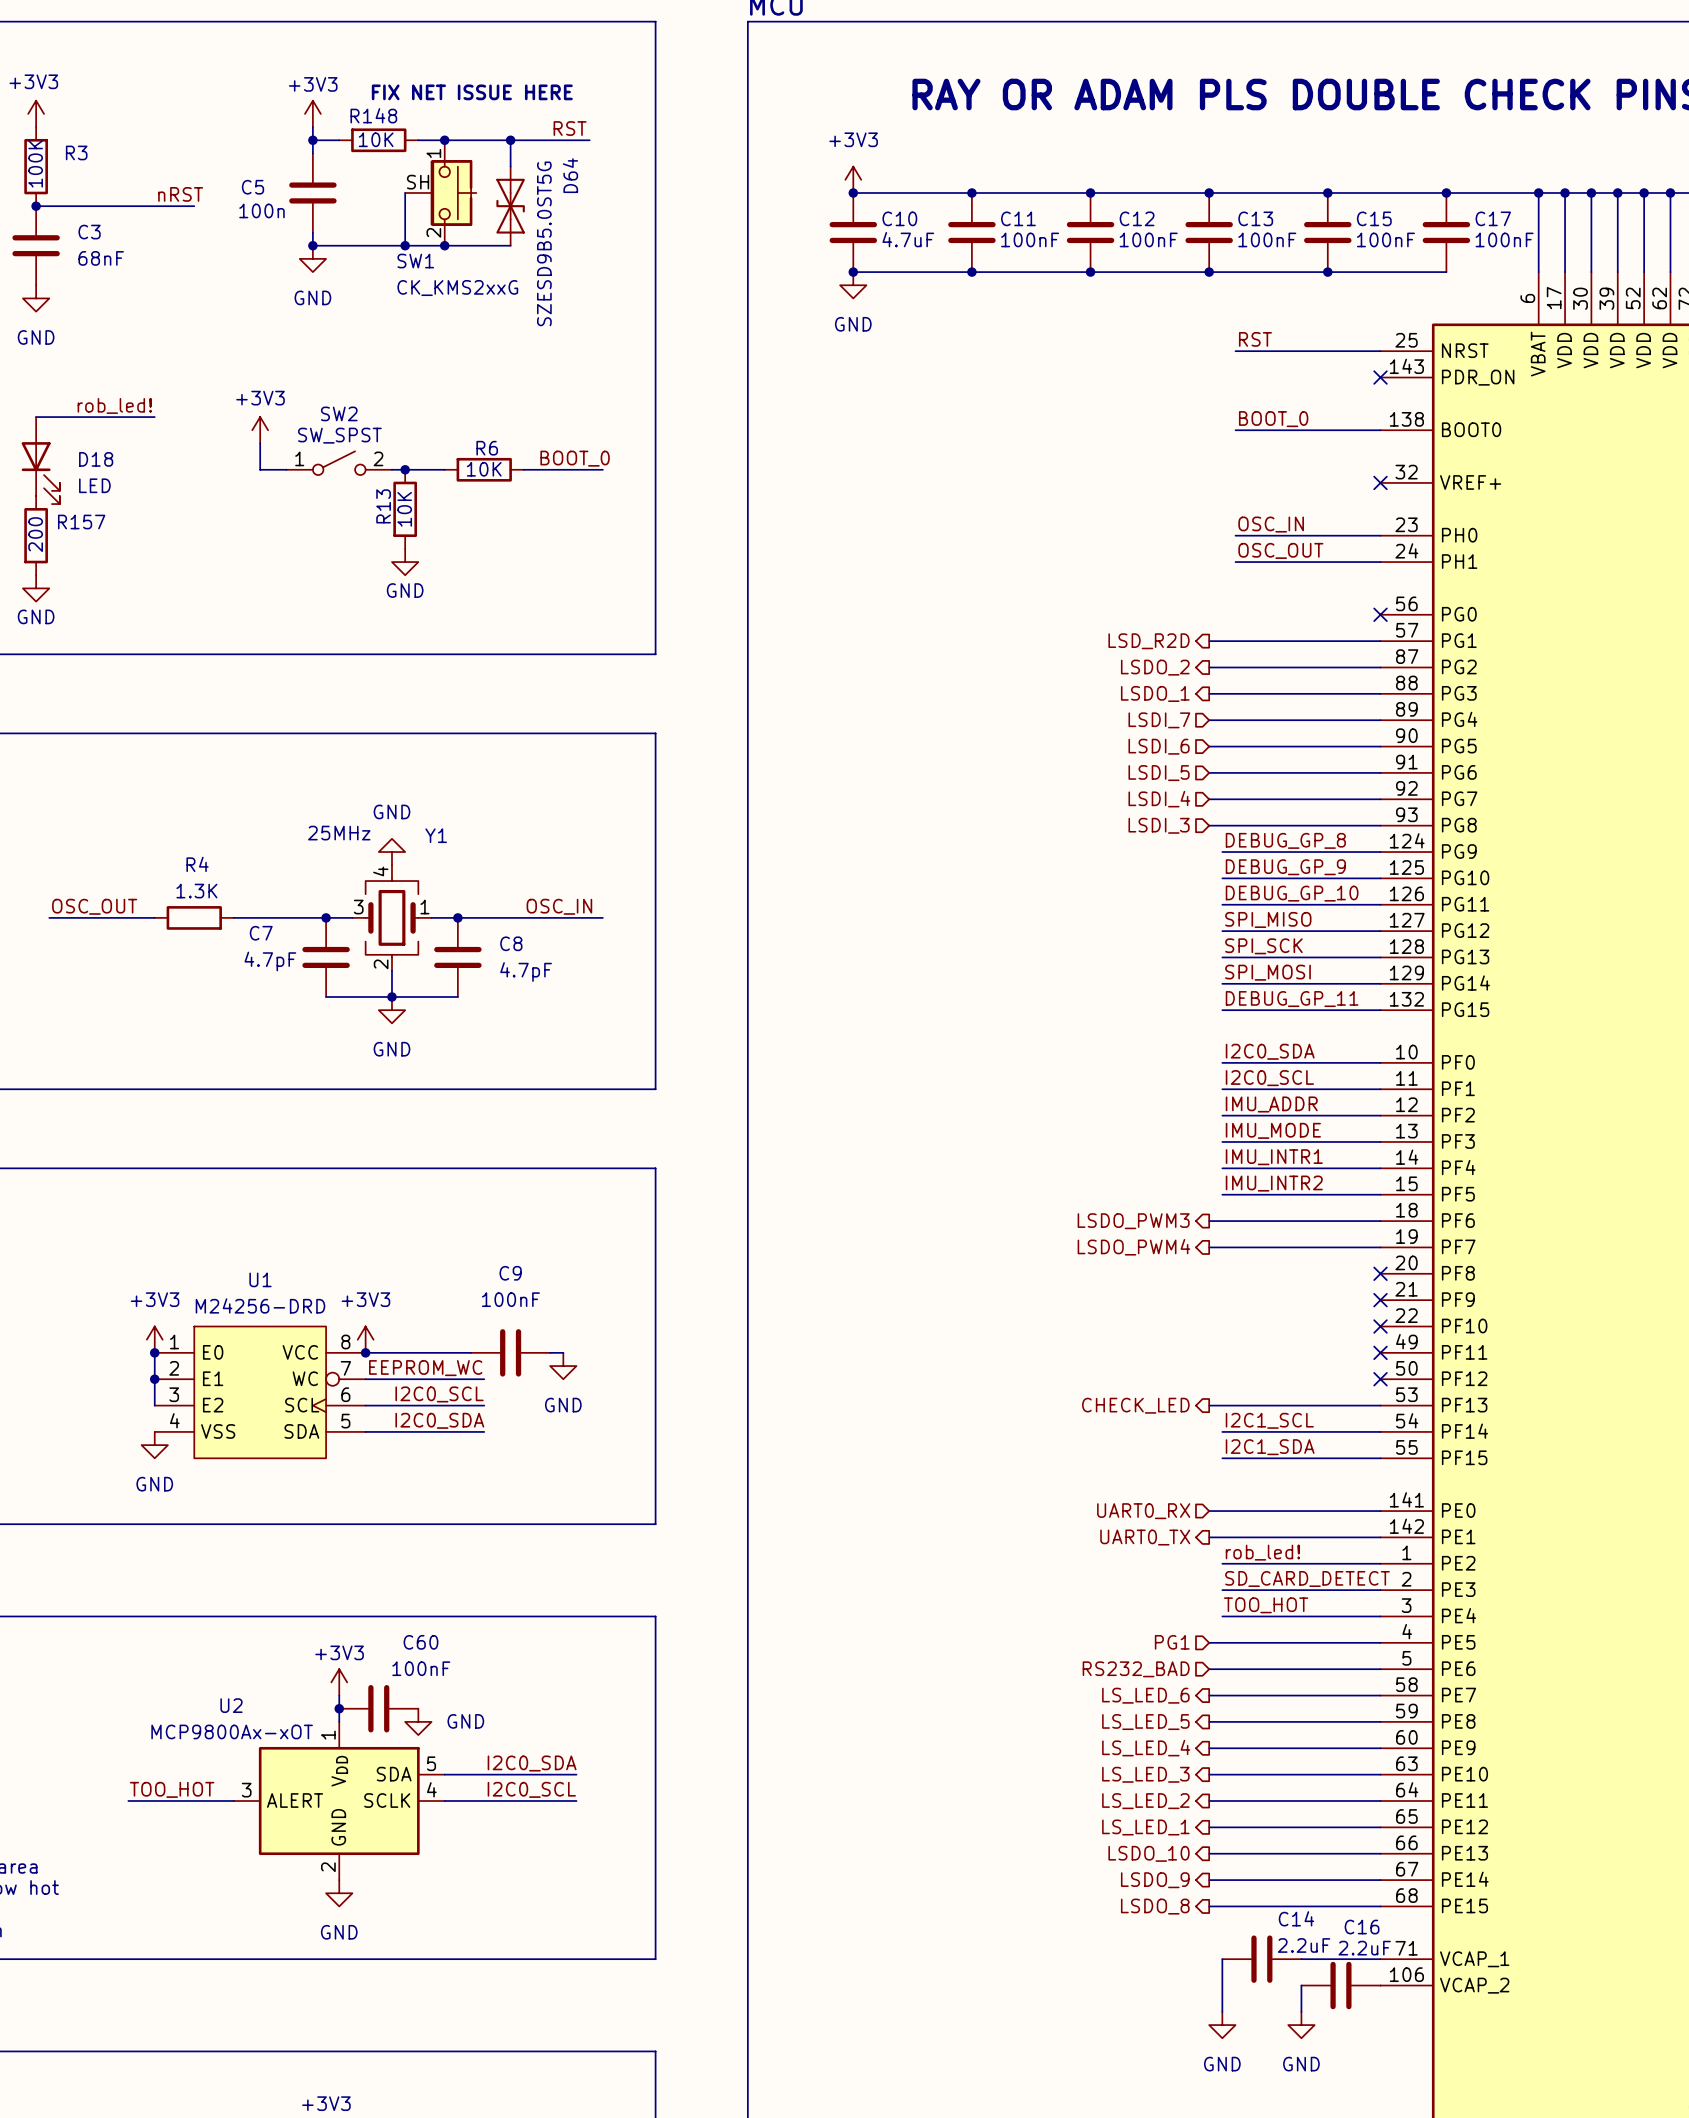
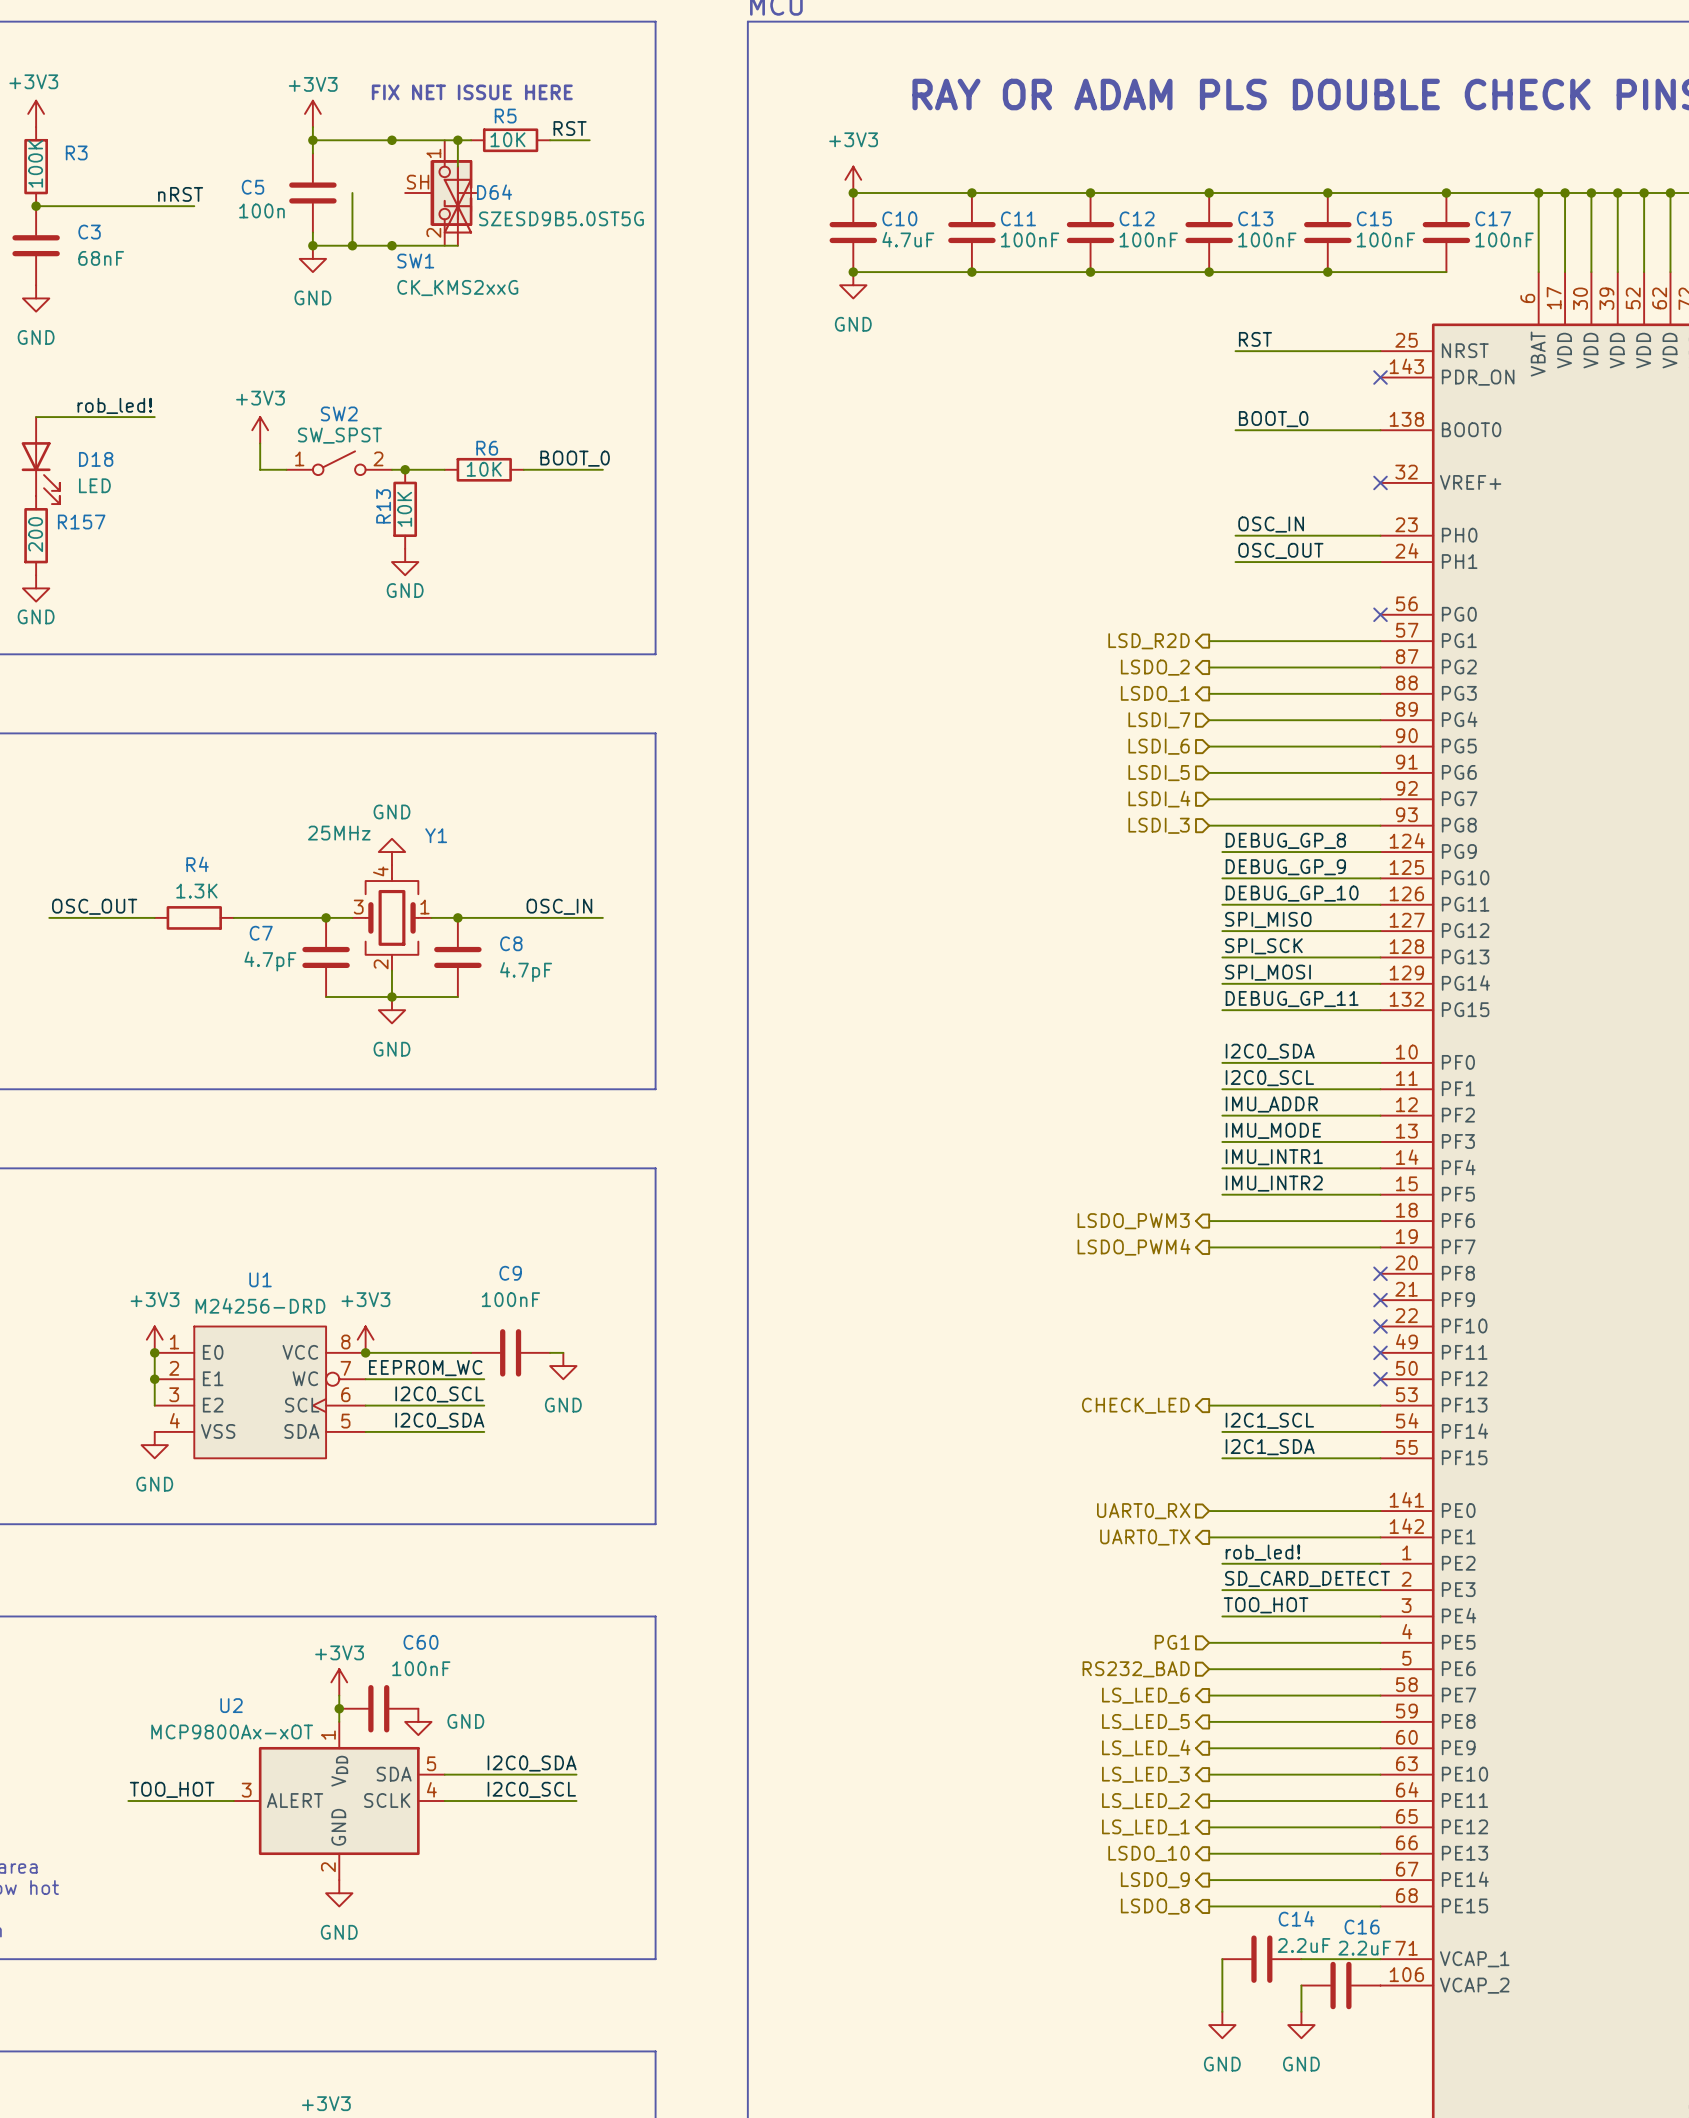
R148: 10K (378, 140) -> none
junction: none -> (391, 140)
junction position: (444, 140) -> (457, 140)
wire: (471, 140) (550, 140) -> (339, 140) (418, 140)
wire: (510, 140) (510, 166) -> (457, 140) (457, 166)
junction: (510, 140) -> none
R5: none -> 10K (510, 140)
D64 name rotation: 0° (570, 175) -> 90° clockwise (494, 192)
wire: (405, 193) (405, 245) -> (352, 193) (352, 245)
D64 position: (510, 206) -> (457, 206)
D64 value rotation: 0° (544, 243) -> 90° clockwise (561, 218)
junction: none -> (352, 245)
junction position: (405, 245) -> (391, 245)
junction: (444, 245) -> none
wire: (457, 245) (510, 245) -> none

